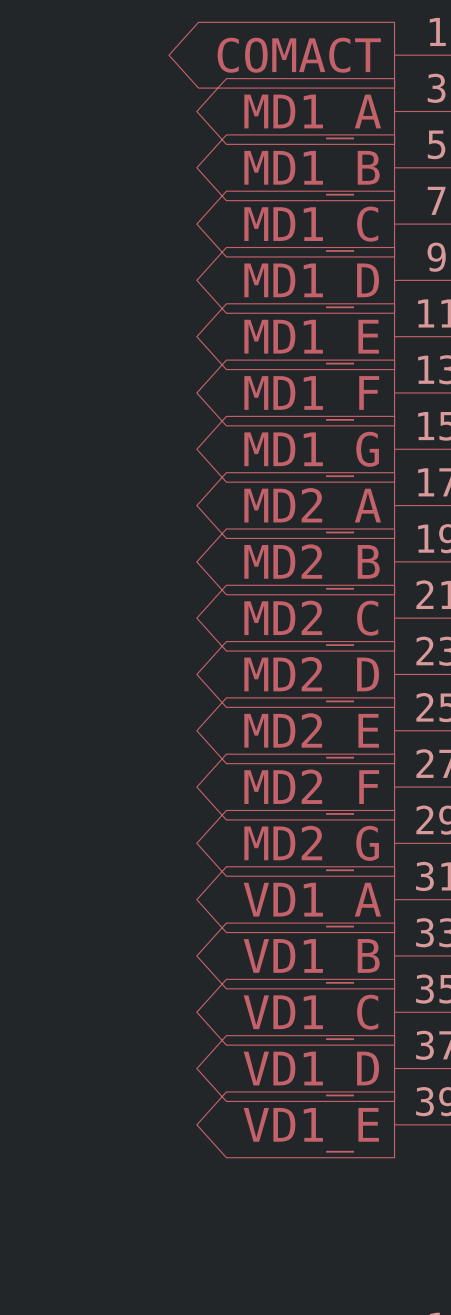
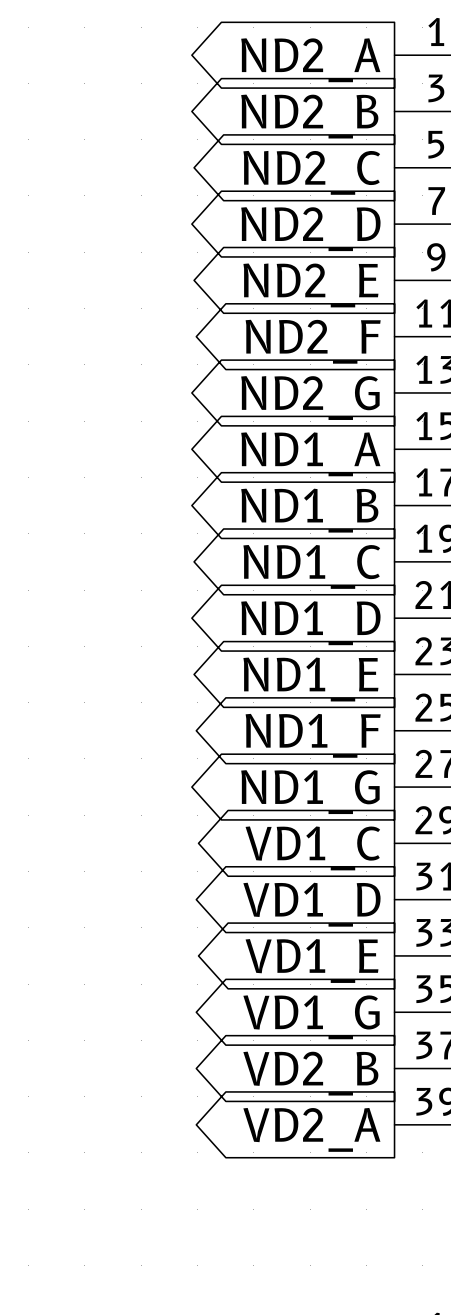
global label: COMACT (299, 55) -> ND2_A (310, 60)
global label: MD1_A (312, 116) -> ND2_B (309, 116)
global label: MD1_B (312, 173) -> ND2_C (311, 172)
global label: MD1_C (311, 229) -> ND2_D (310, 229)
global label: MD1_D (311, 285) -> ND2_E (310, 285)
global label: MD1_E (311, 342) -> ND2_F (313, 341)
global label: MD1_F (311, 398) -> ND2_G (310, 398)
global label: MD1_G (311, 454) -> ND1_A (310, 454)
global label: MD2_A (312, 510) -> ND1_B (309, 510)
global label: MD2_B (312, 567) -> ND1_C (311, 566)
global label: MD2_C (311, 623) -> ND1_D (310, 623)
global label: MD2_D (311, 679) -> ND1_E (310, 679)
global label: MD2_E (311, 735) -> ND1_F (313, 735)
global label: MD2_F (311, 792) -> ND1_G (310, 792)
global label: MD2_G (311, 848) -> VD1_C (312, 848)
global label: VD1_A (312, 905) -> VD1_D (311, 904)
global label: VD1_B (311, 961) -> VD1_E (312, 961)
global label: VD1_C (310, 1017) -> VD1_G (311, 1017)
global label: VD1_D (311, 1074) -> VD2_B (310, 1073)
global label: VD1_E (311, 1130) -> VD2_A (311, 1129)

